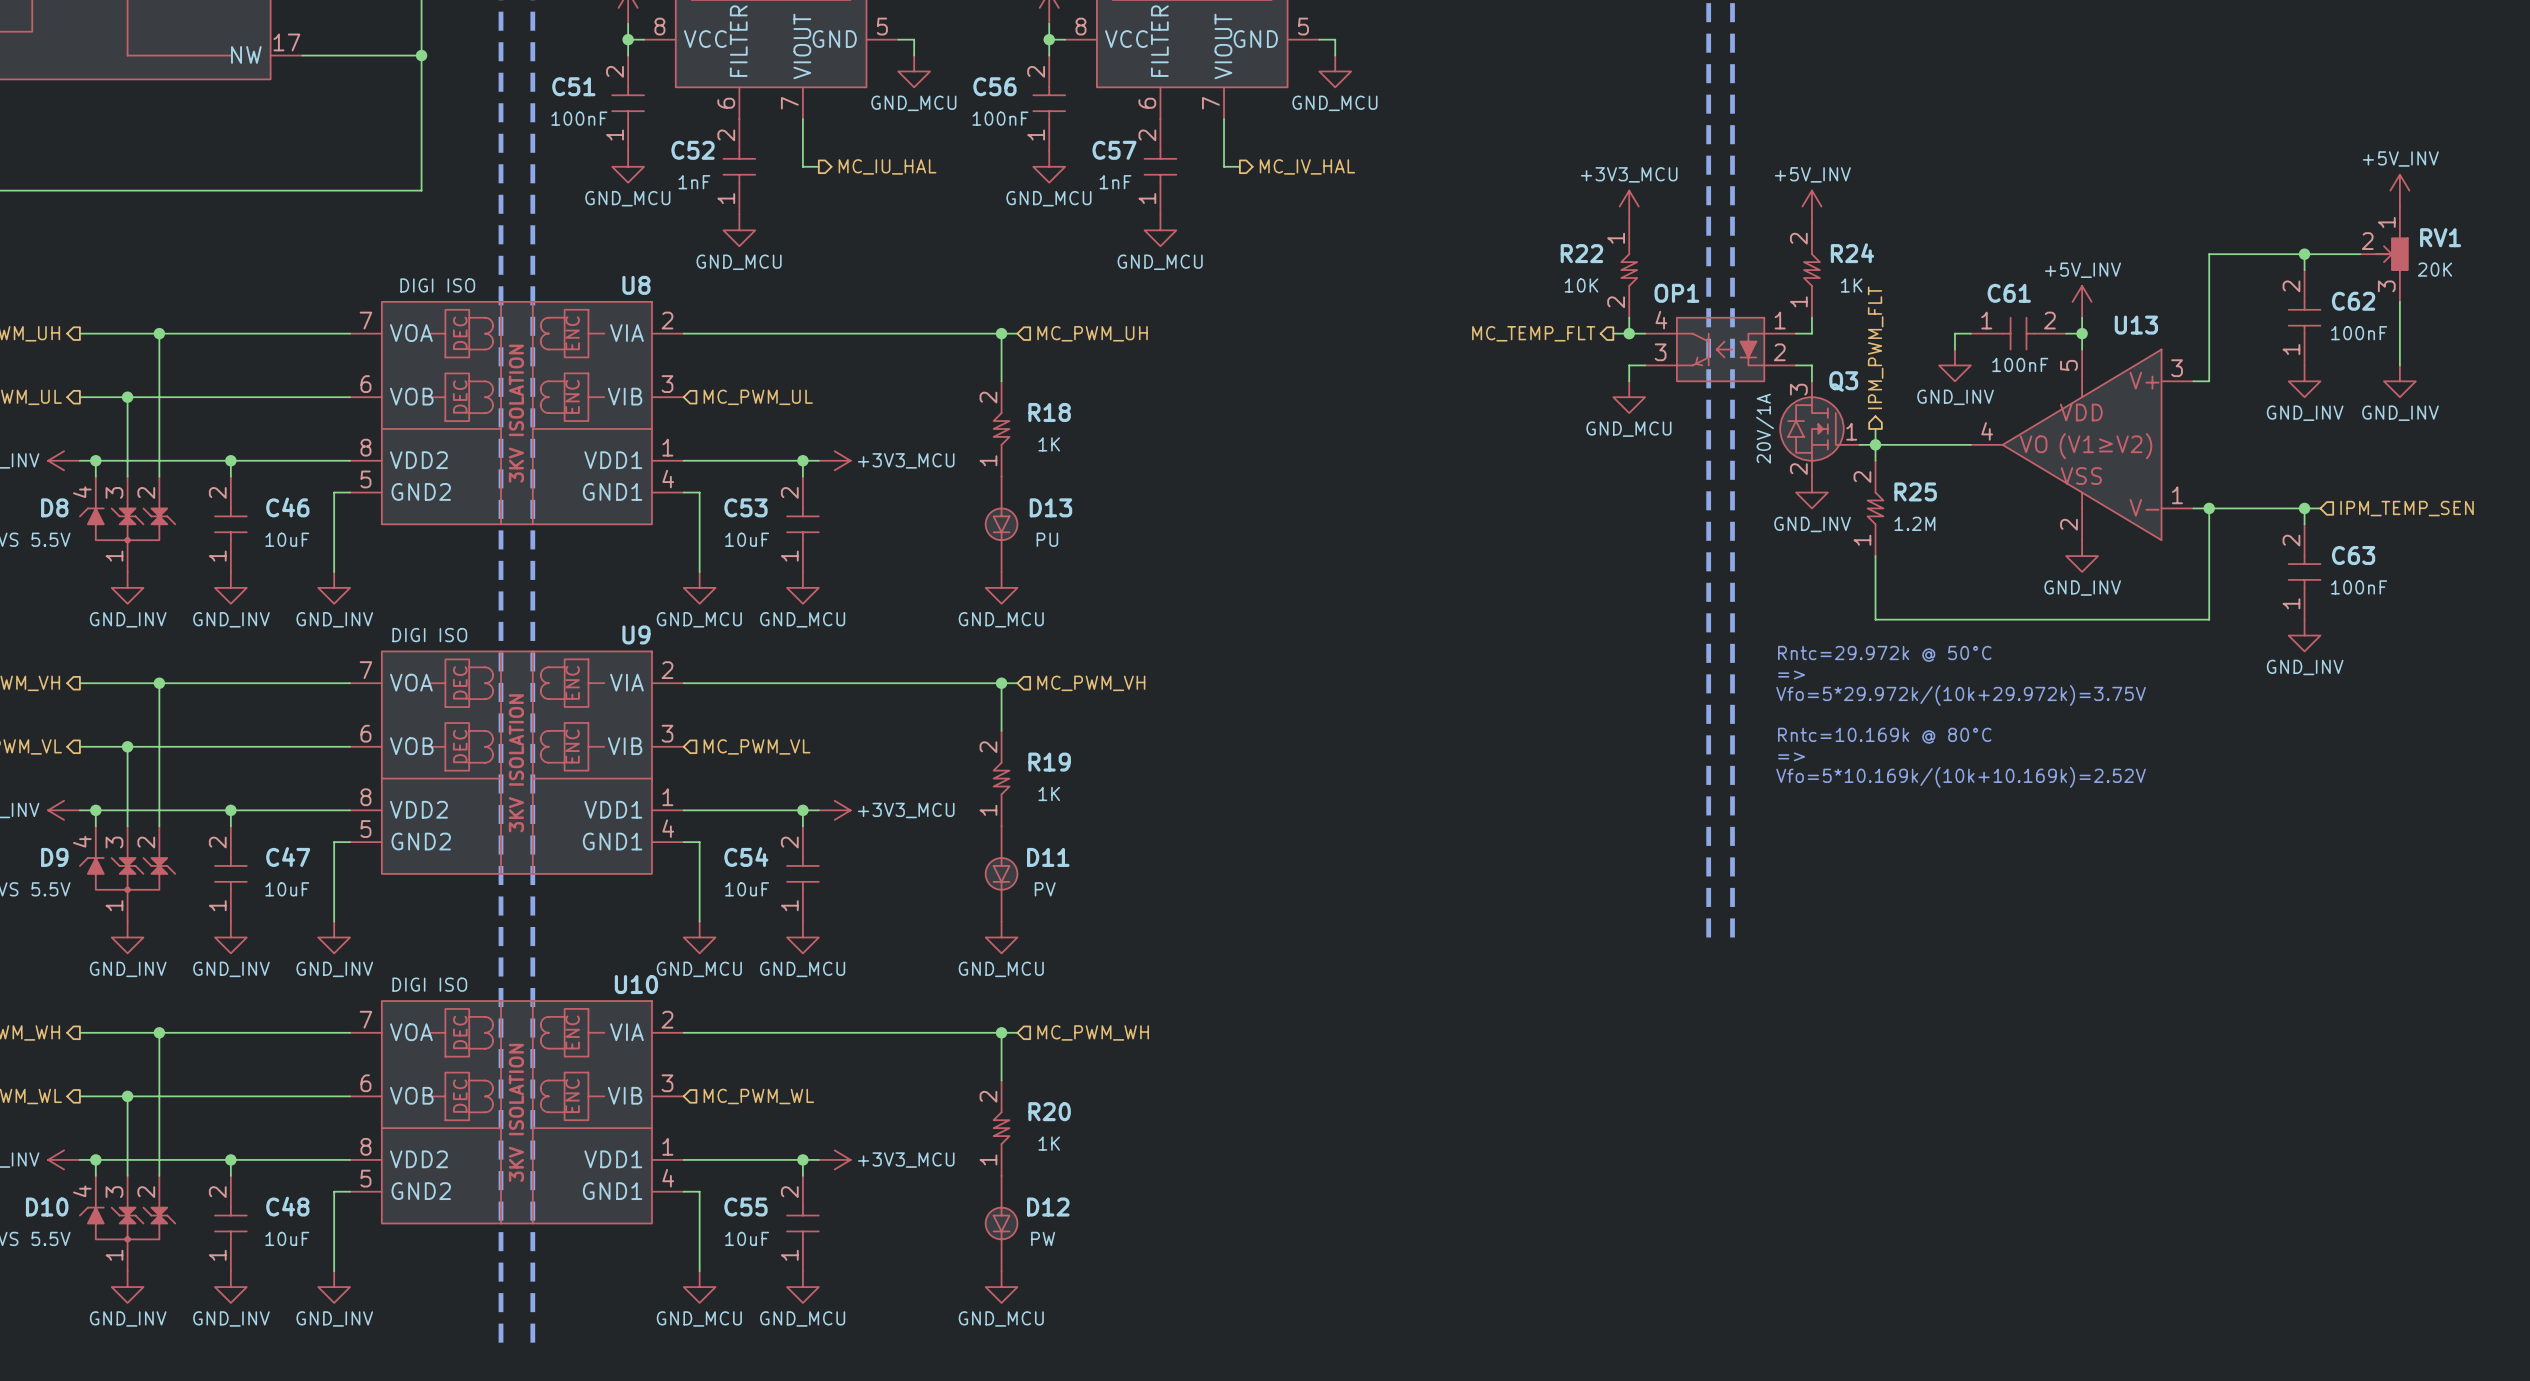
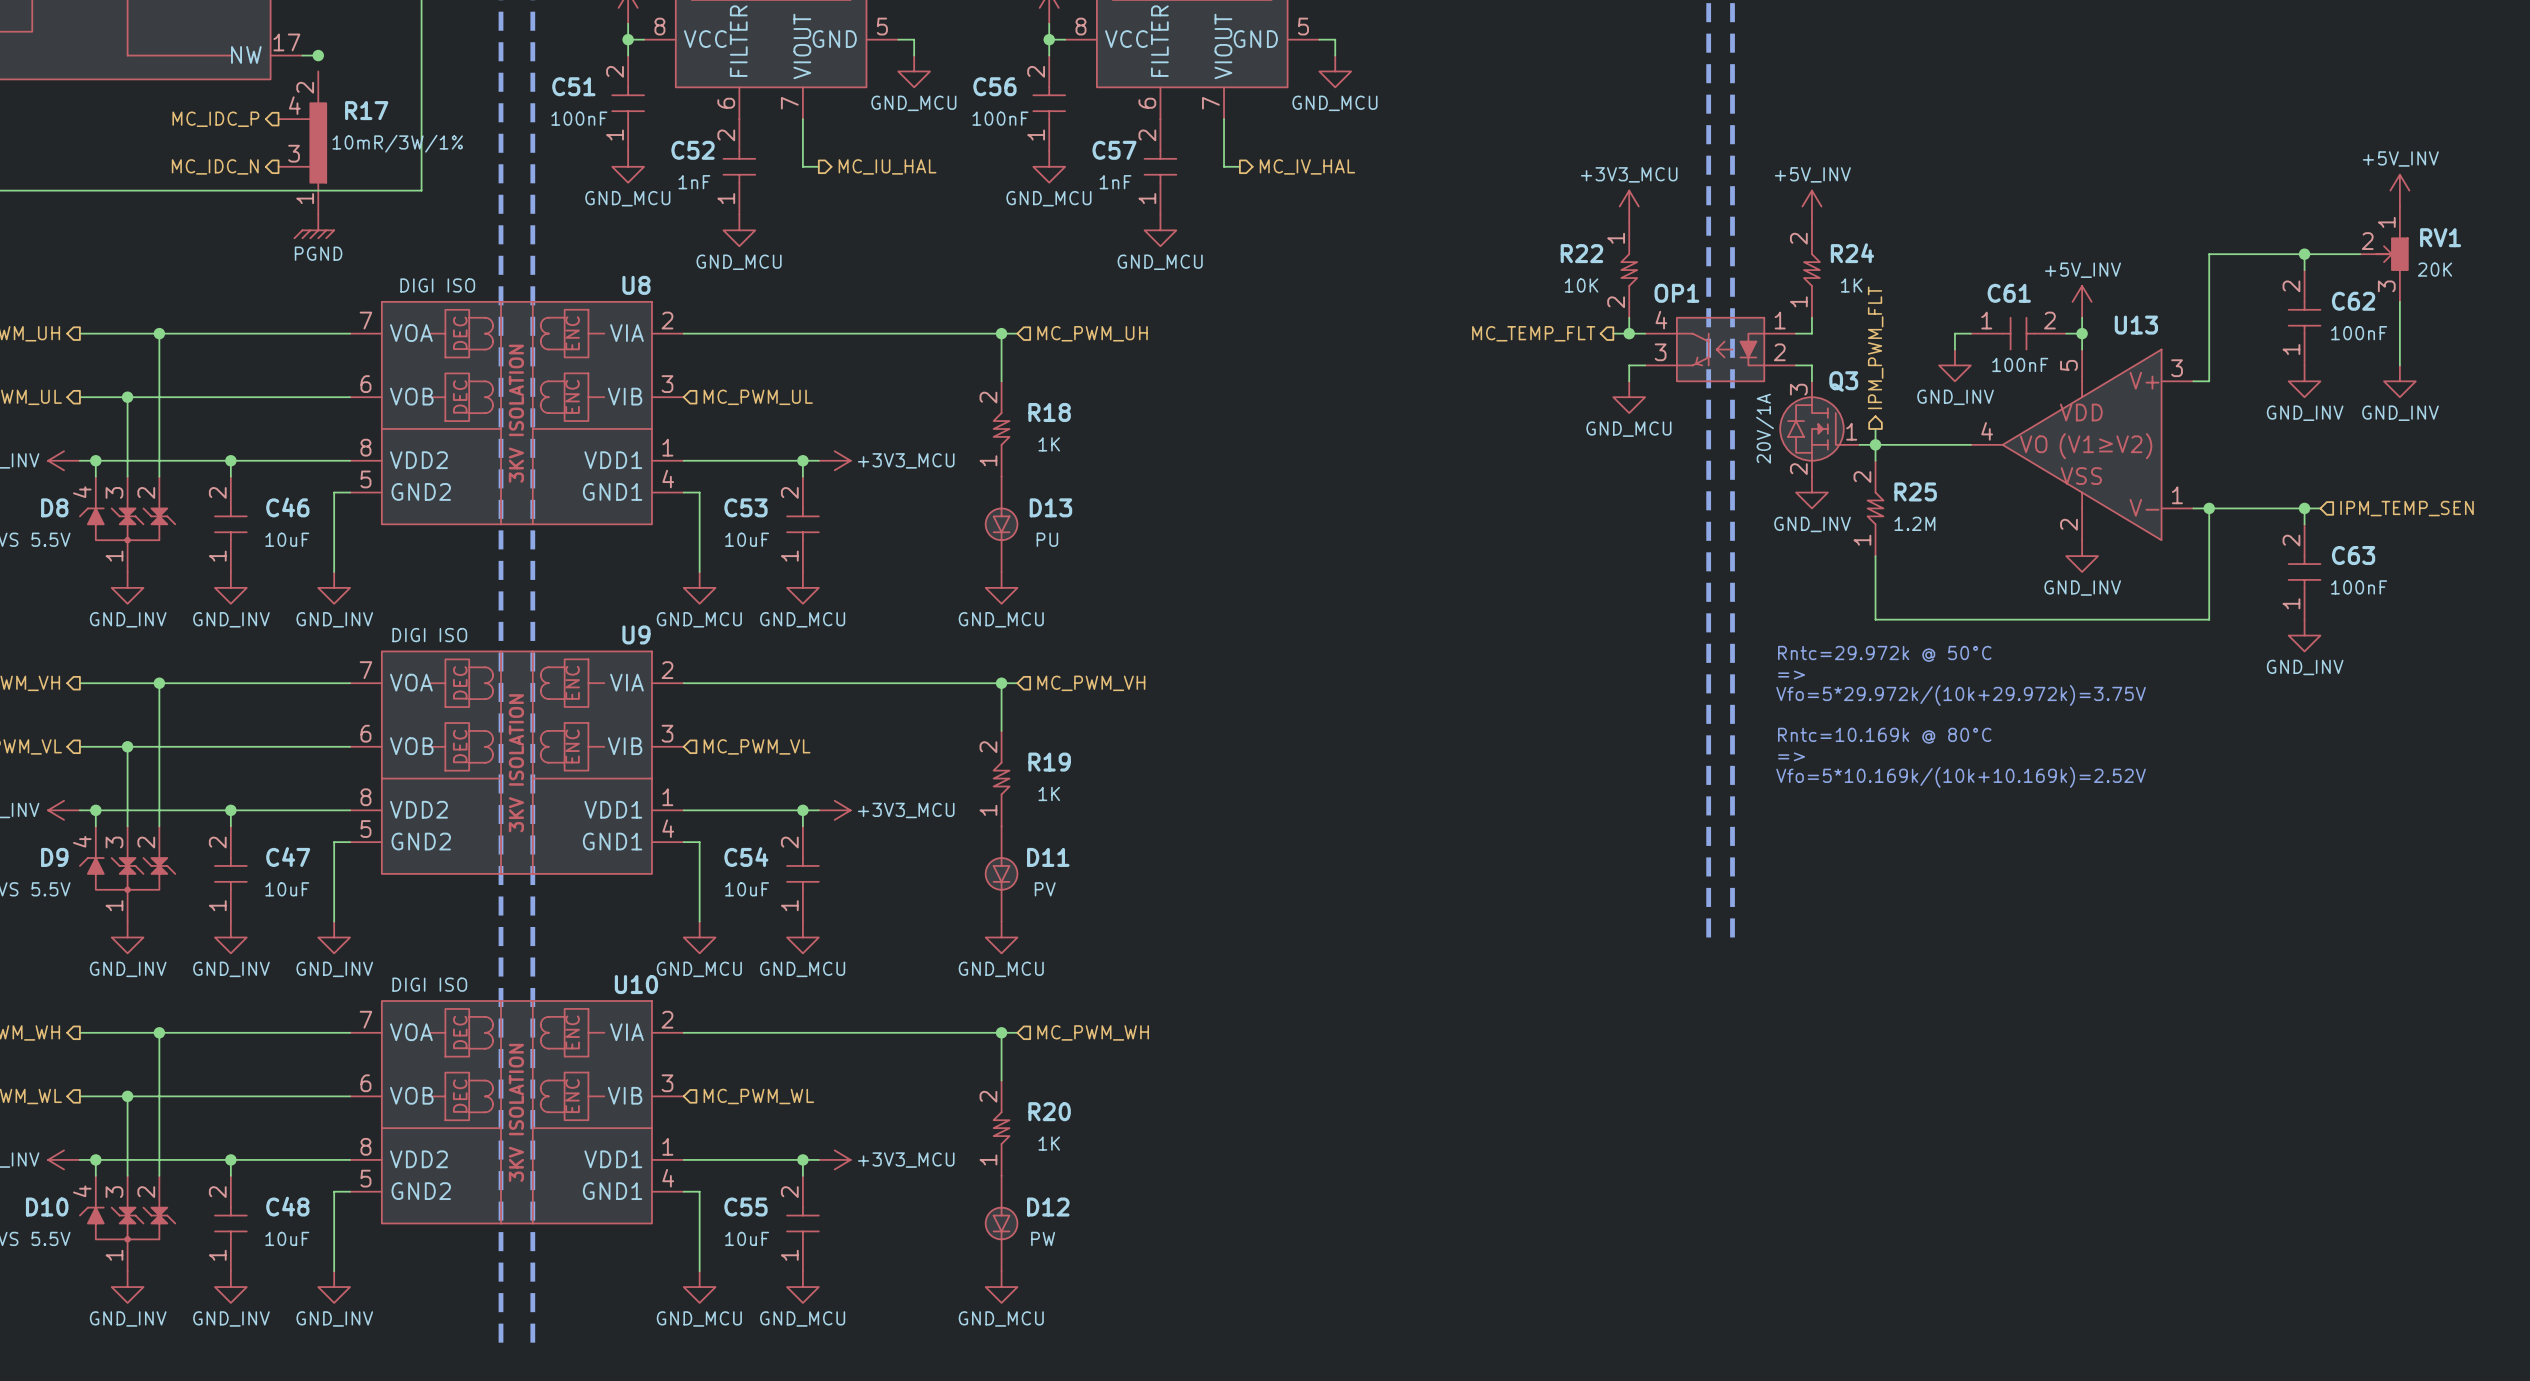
wire: (318, 55) (421, 55) -> none
junction: none -> (318, 55)
junction: (421, 55) -> none
hierarchical label: none -> MC_IDC_P (215, 119)
R17: none -> 10mR/3W/1% (302, 142)
hierarchical label: none -> MC_IDC_N (215, 166)
power symbol: none -> PGND (314, 226)

